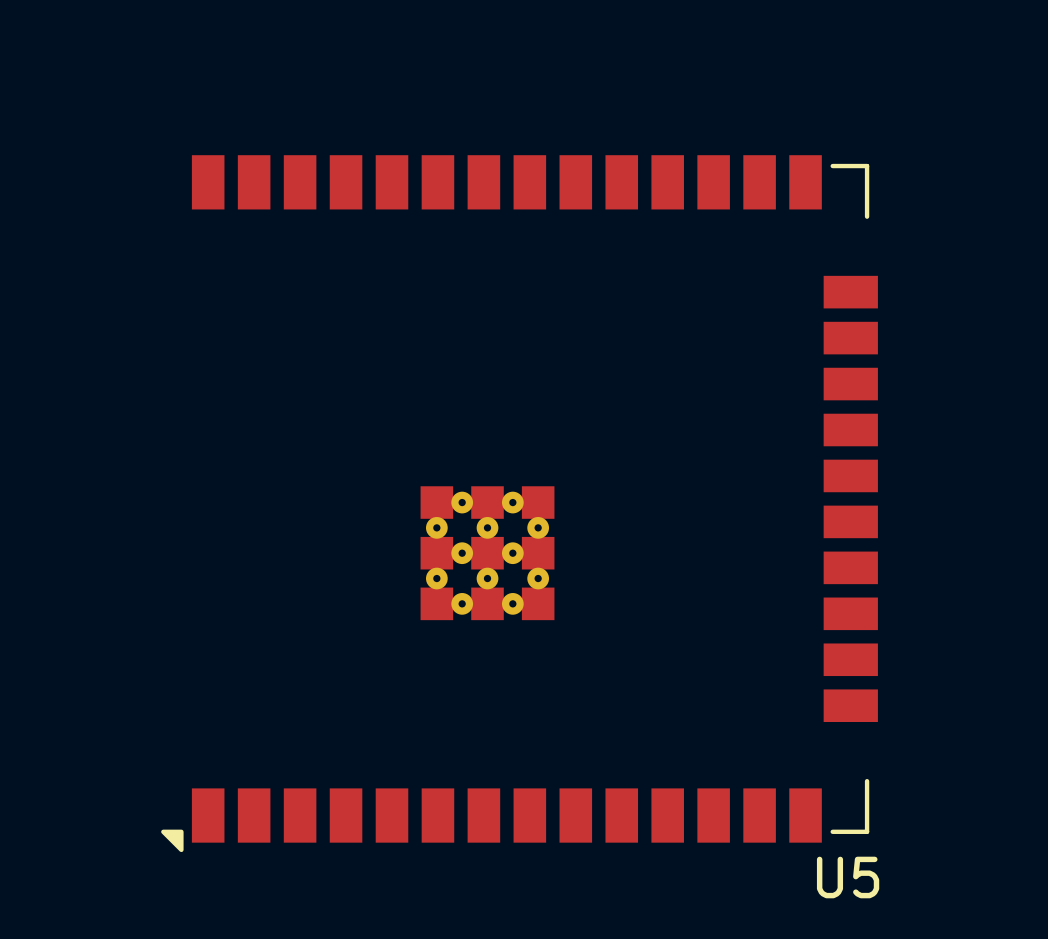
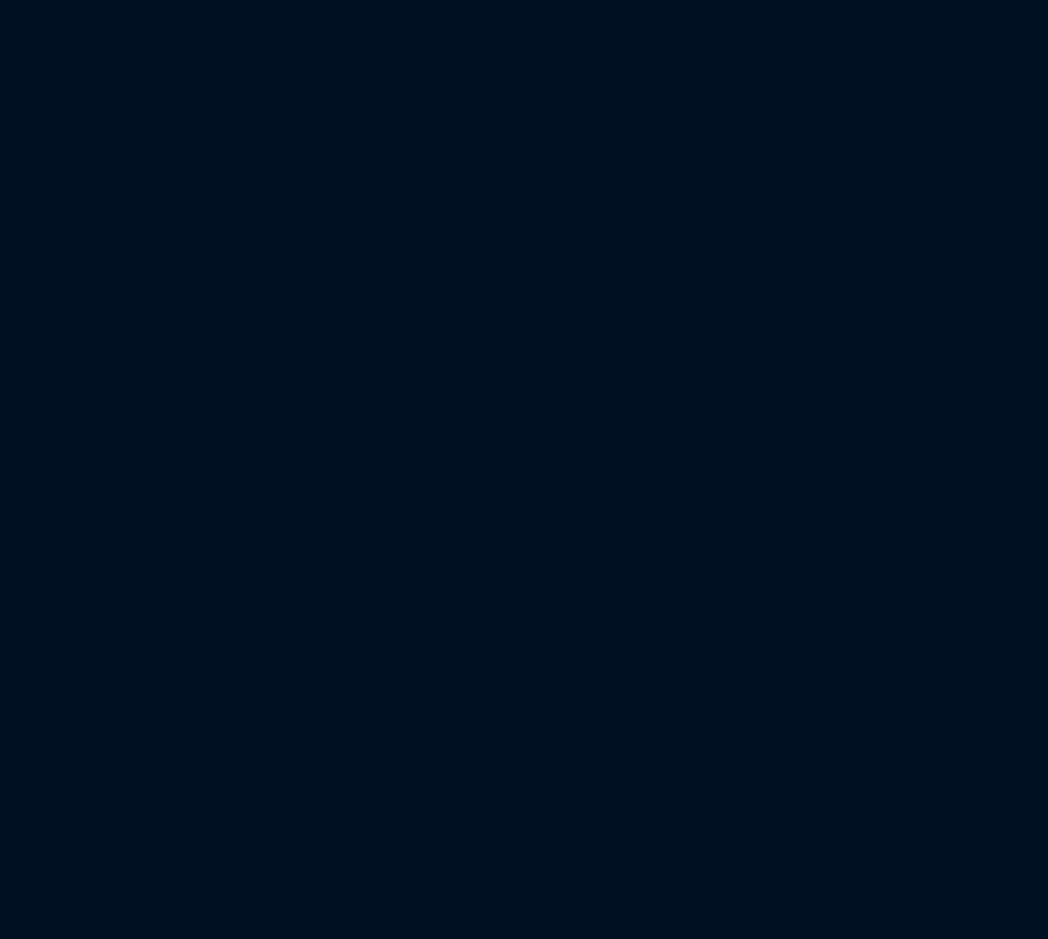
U5: (519, 503) -> none

